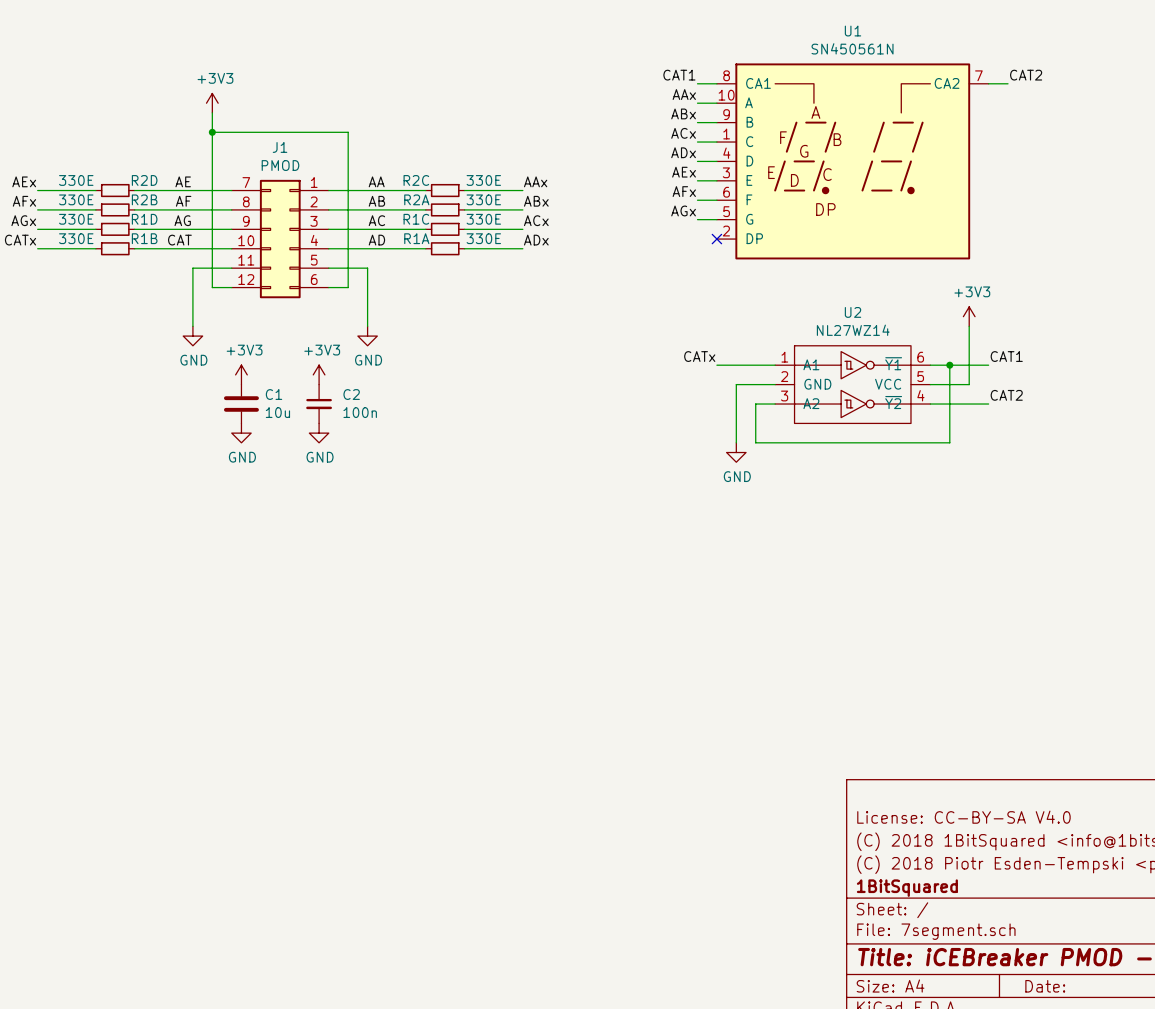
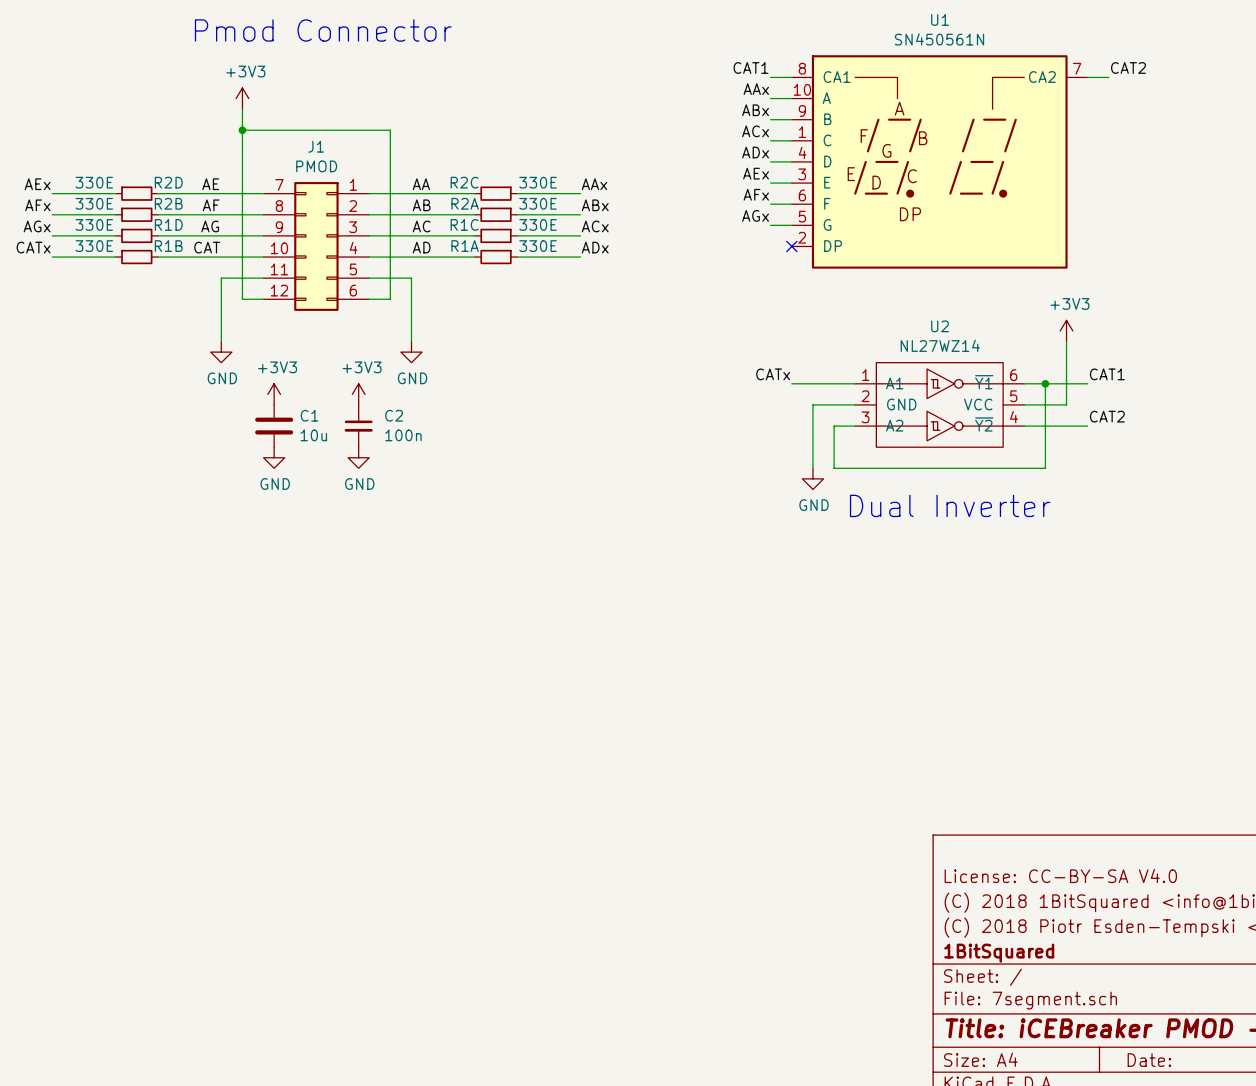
text: none -> Pmod Connector (323, 30)
text: none -> Dual Inverter (950, 505)

